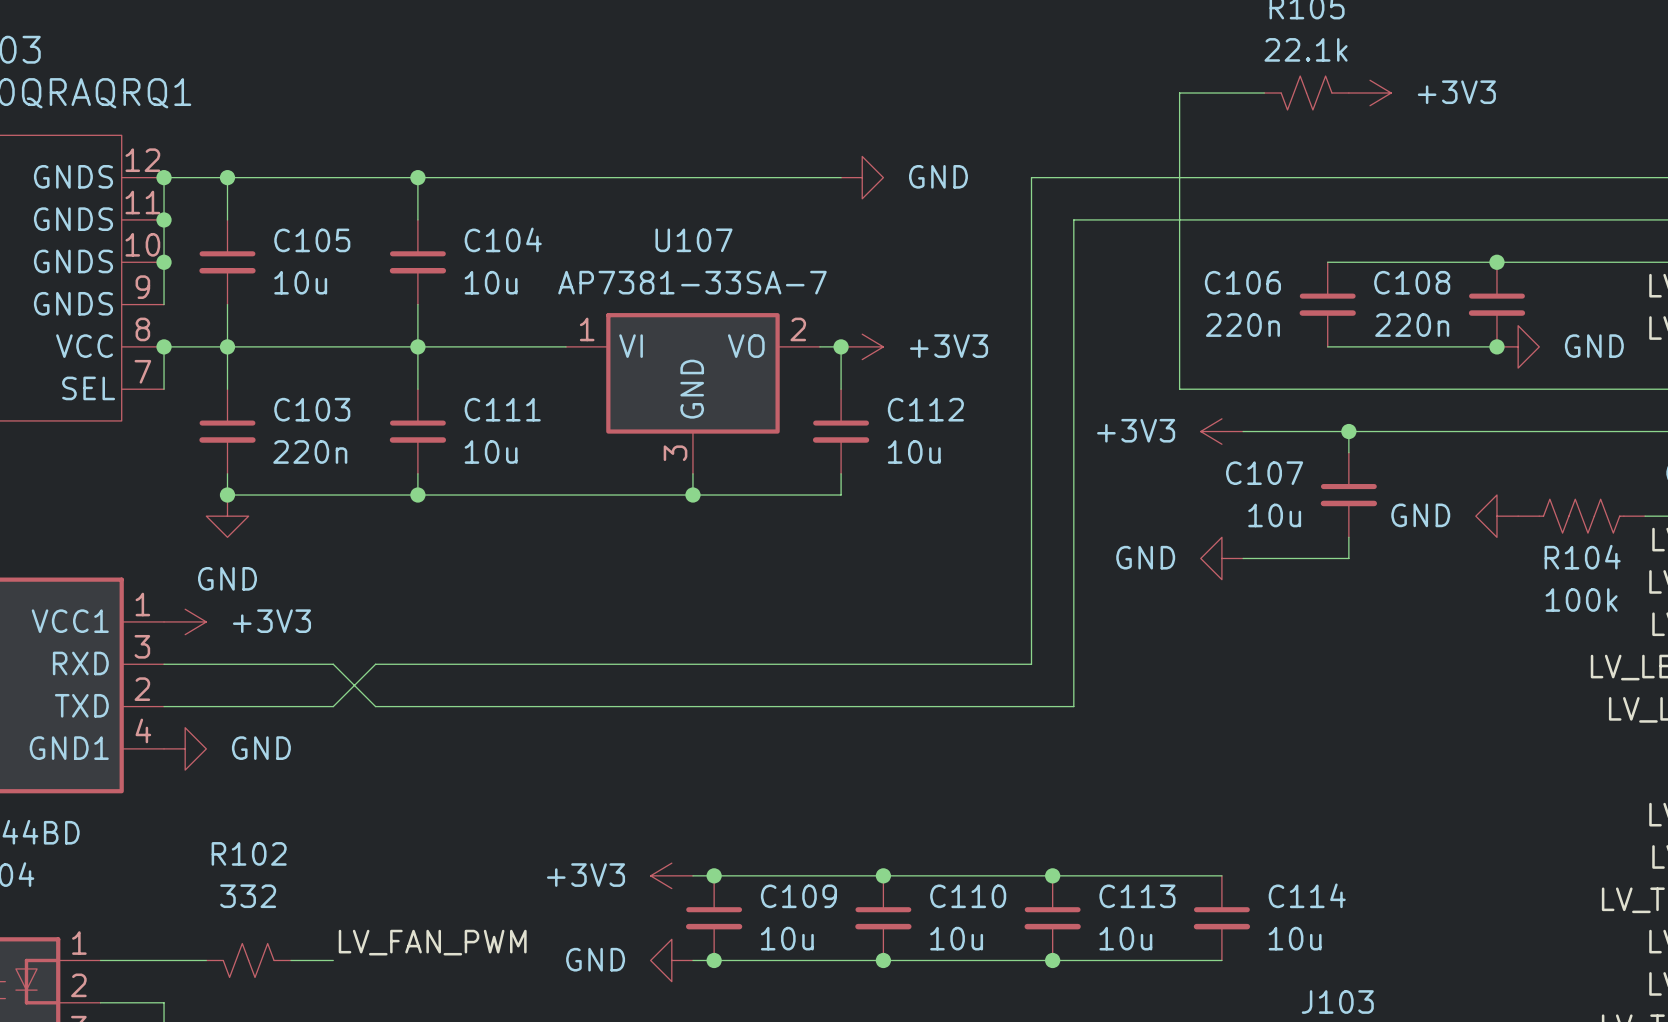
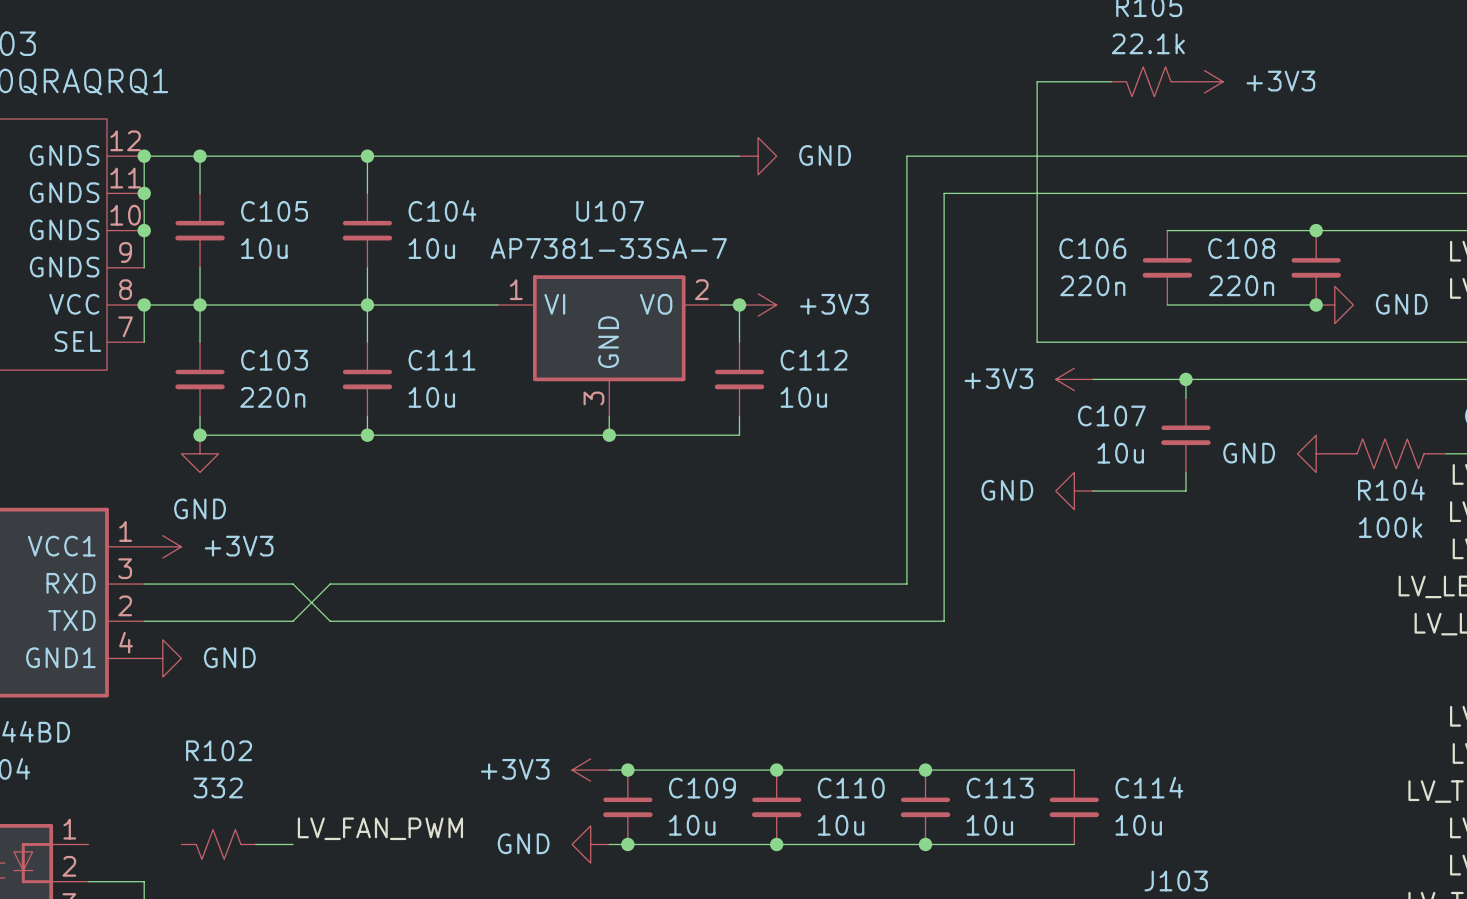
wire: (100, 960) (206, 960) -> none

